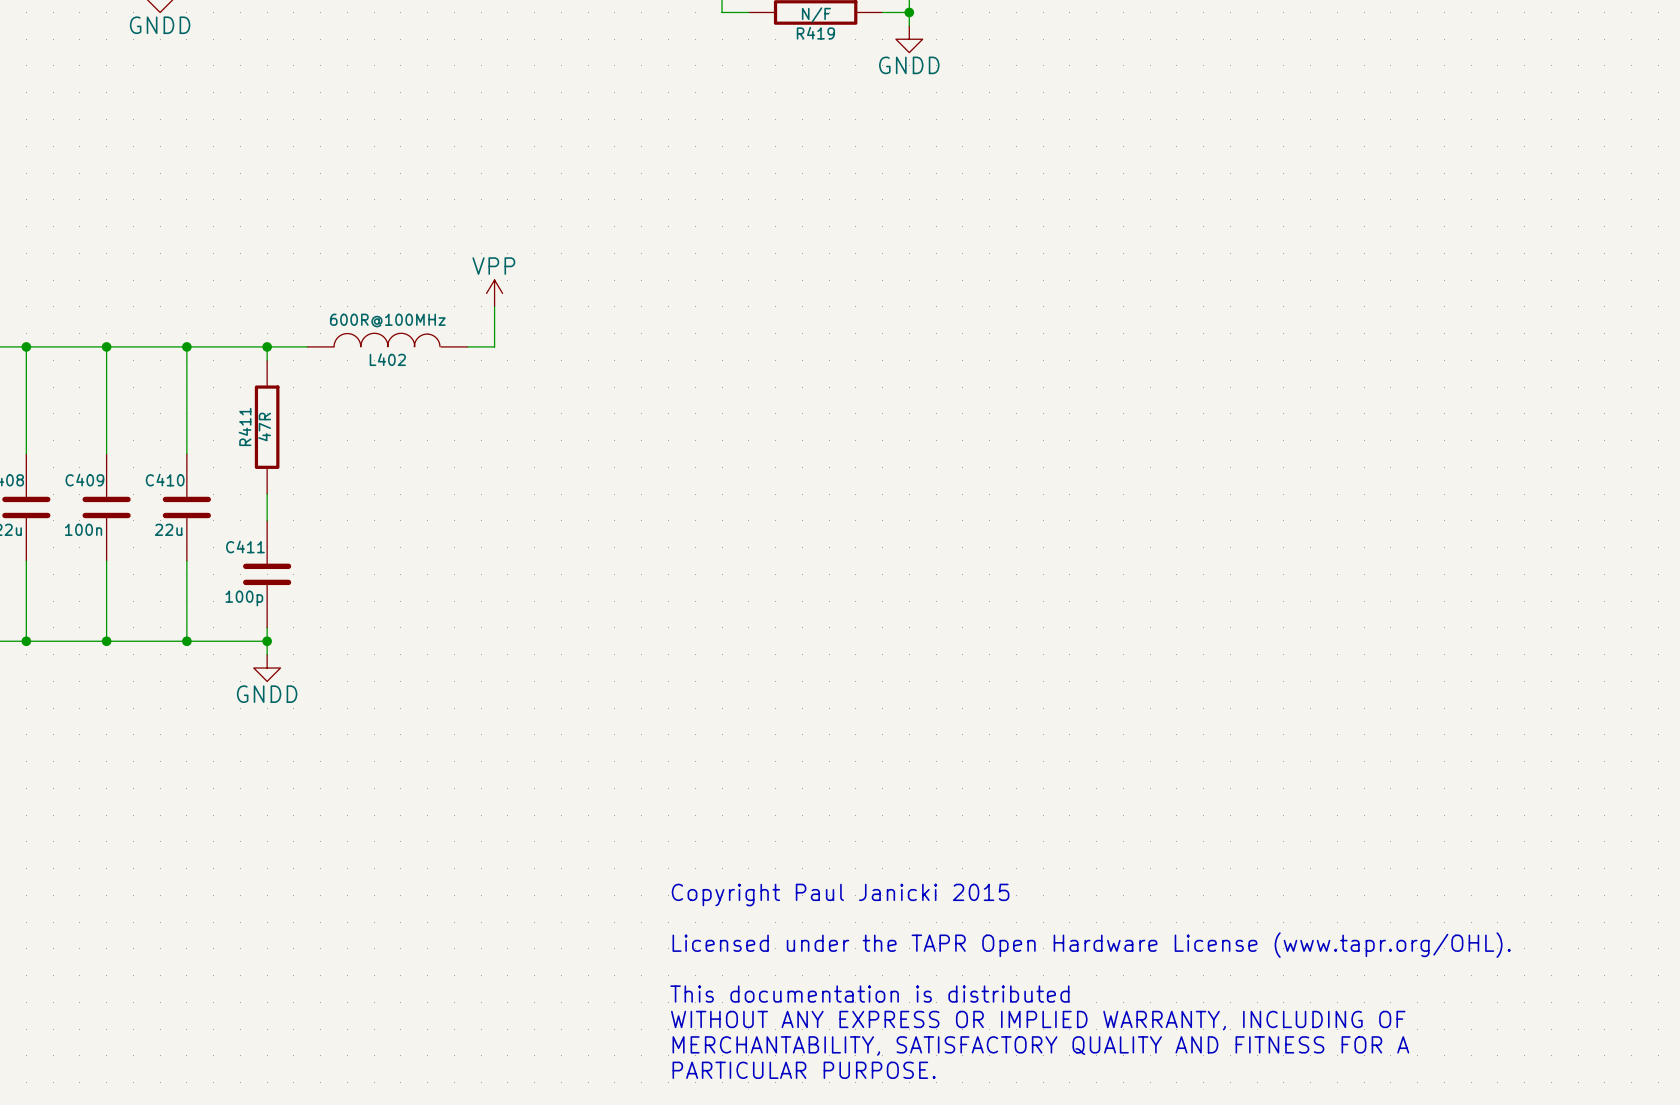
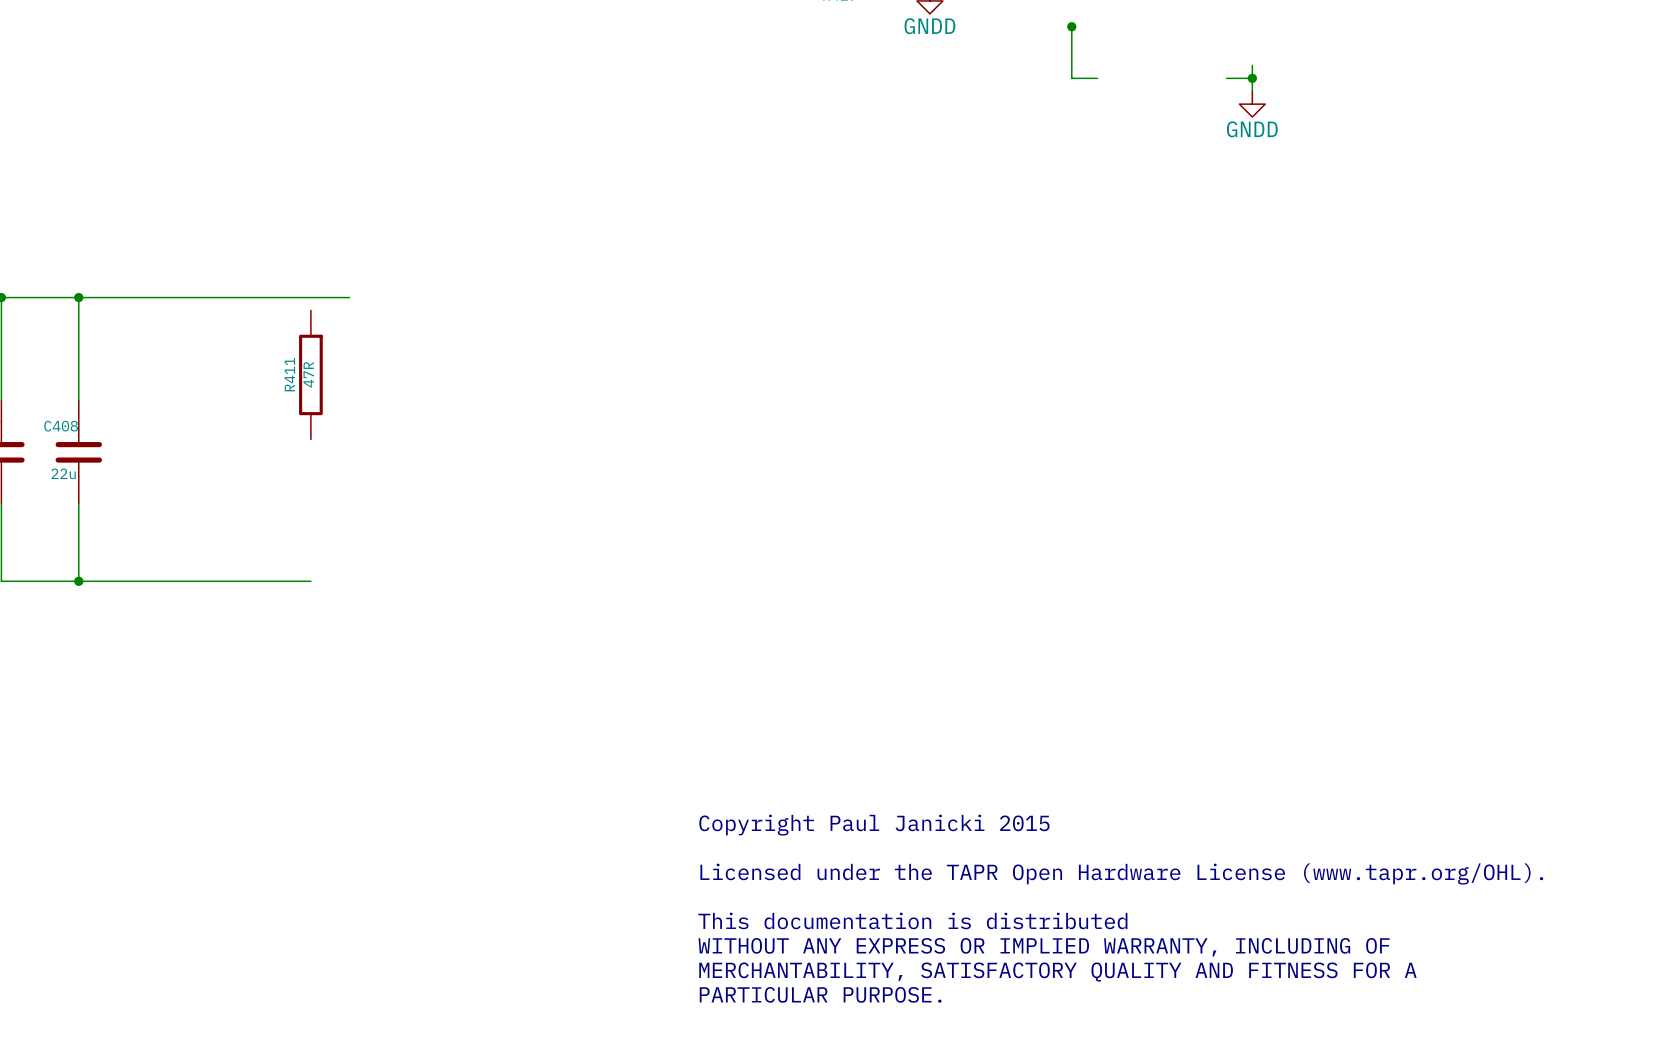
wire: none -> (1071, 26) (1071, 78) (1097, 78)
junction: none -> (1071, 26)
wire: none -> (1252, 65) (1252, 91)
wire: none -> (1226, 78) (1252, 78)
junction: none -> (1252, 78)
power symbol: none -> GNDD (1252, 104)
power symbol: VPP (494, 293) -> none
wire: (494, 306) (494, 346) (467, 346) -> none
L402: 600R@100MHz (387, 340) -> none
wire: (106, 346) (106, 453) -> none
junction: (106, 346) -> none
wire: (186, 346) (186, 453) -> none
junction: (186, 346) -> none
wire: (267, 346) (267, 360) -> none
junction: (267, 346) -> none
wire: (267, 494) (267, 520) -> none
C409: 100n (106, 507) -> none
C410: 22u (186, 507) -> none
wire: (106, 560) (106, 641) -> none
wire: (186, 560) (186, 641) -> none
C411: 100p (267, 574) -> none
wire: (267, 627) (267, 654) -> none
junction: (106, 641) -> none
junction: (186, 641) -> none
junction: (267, 641) -> none
power symbol: GNDD (267, 668) -> none

